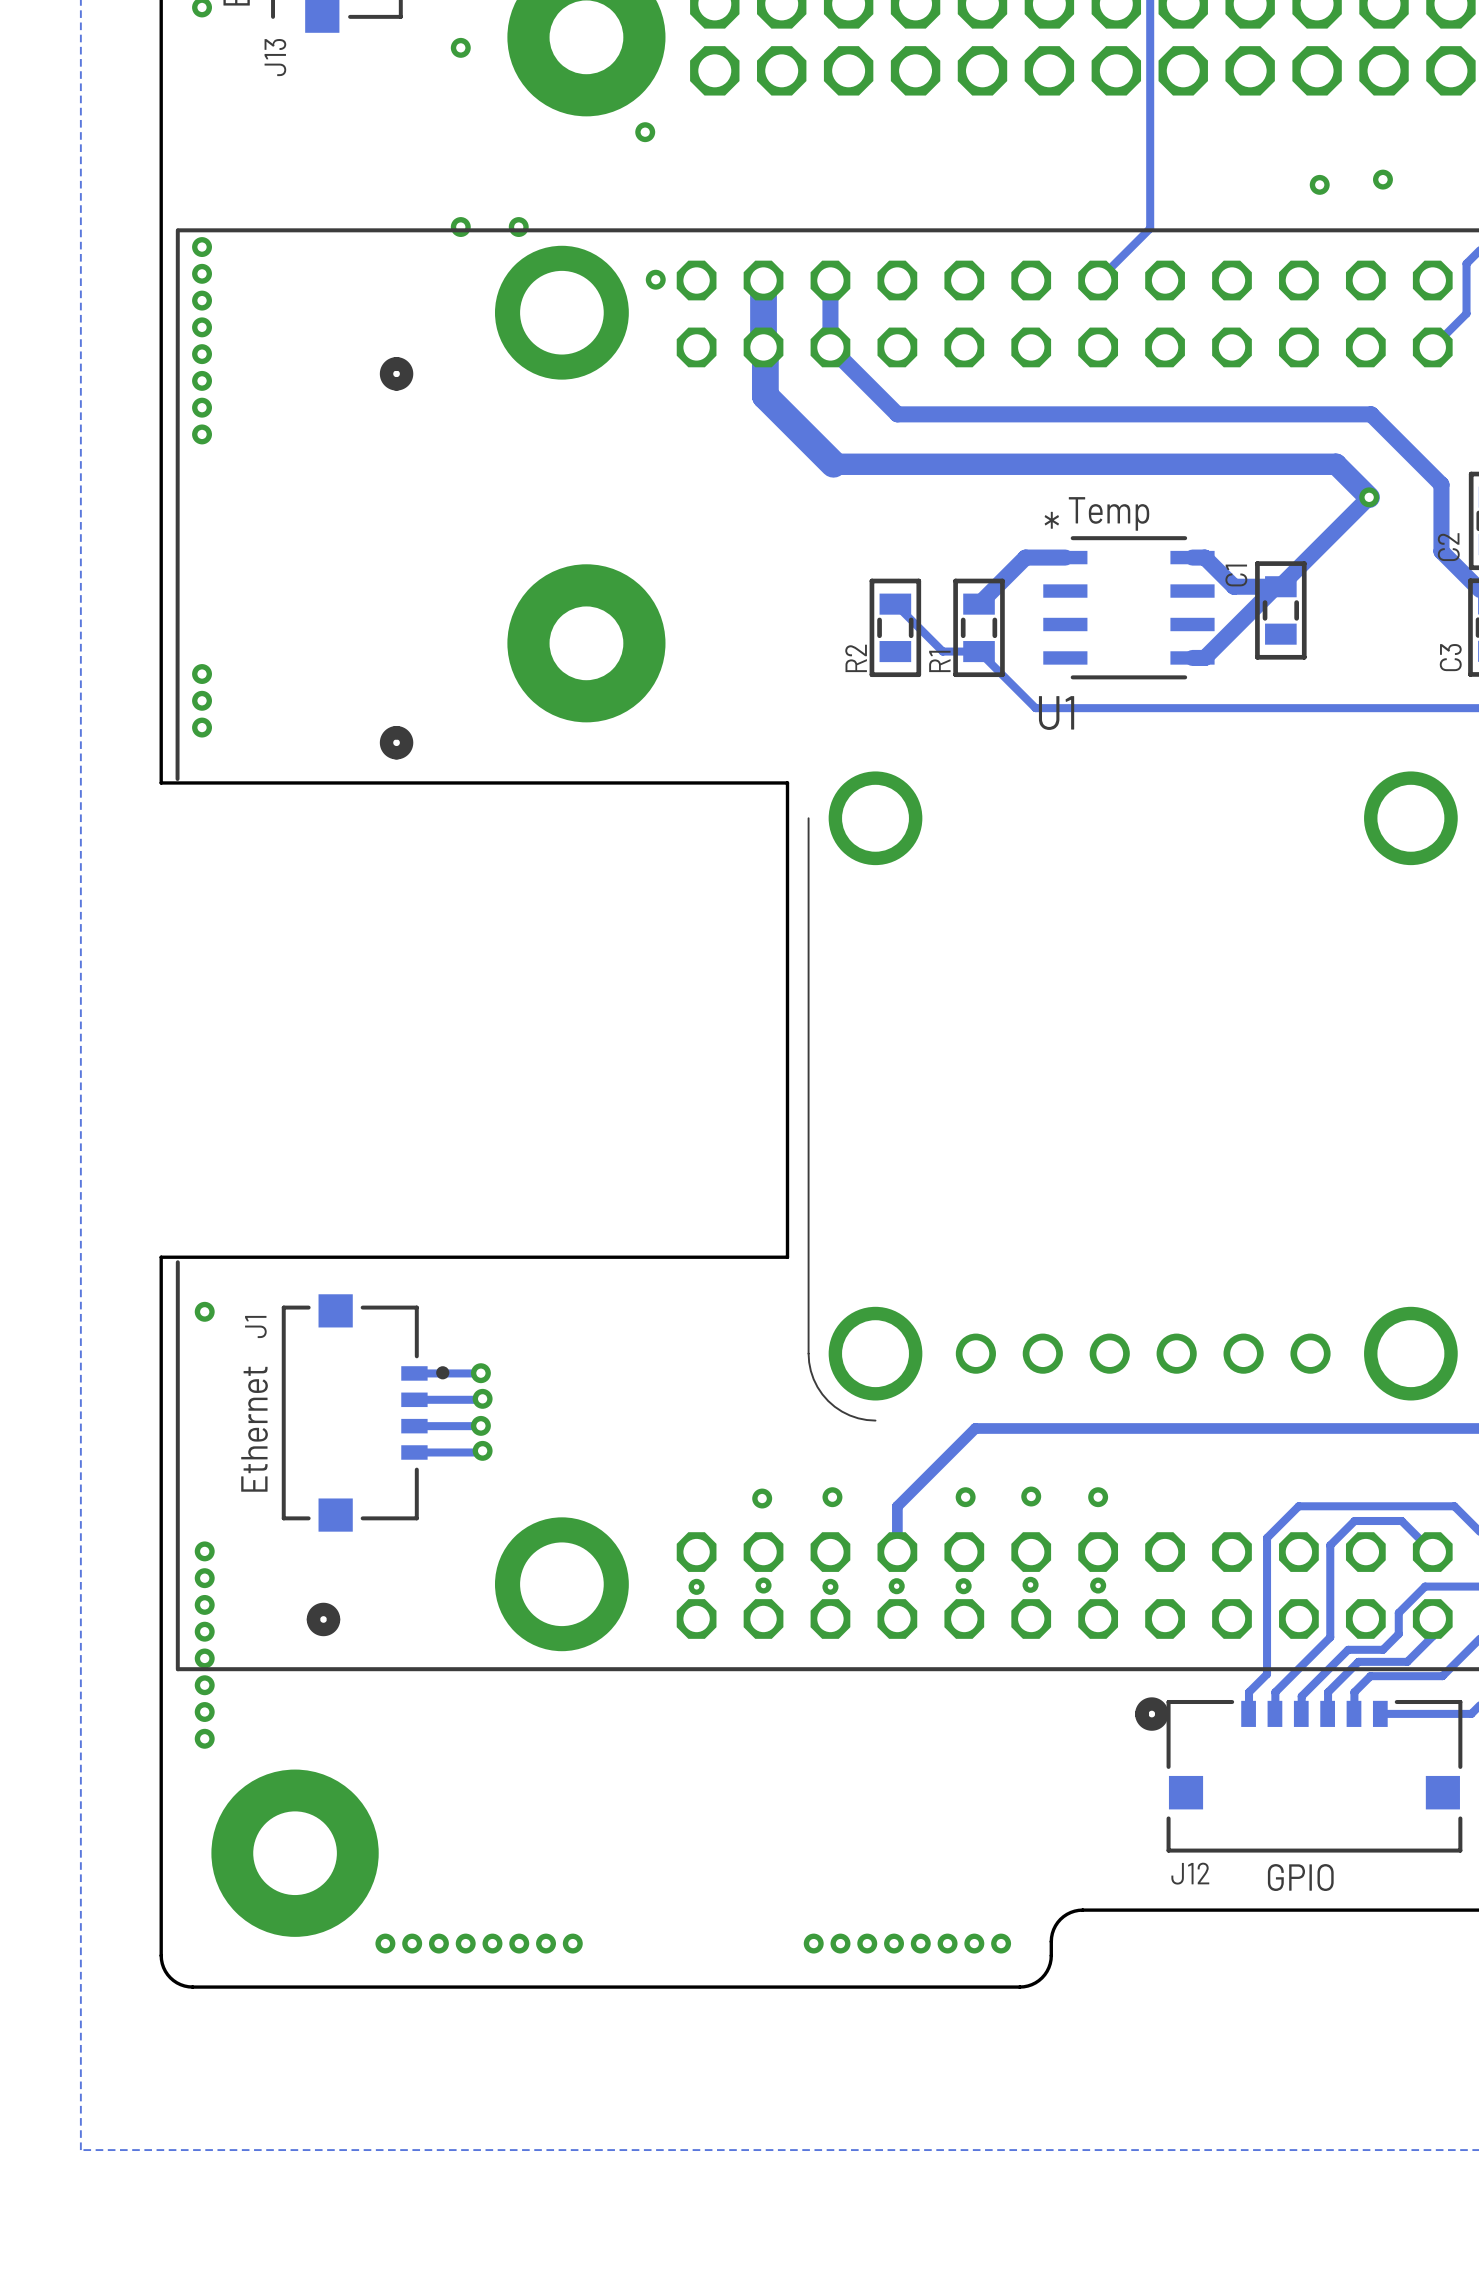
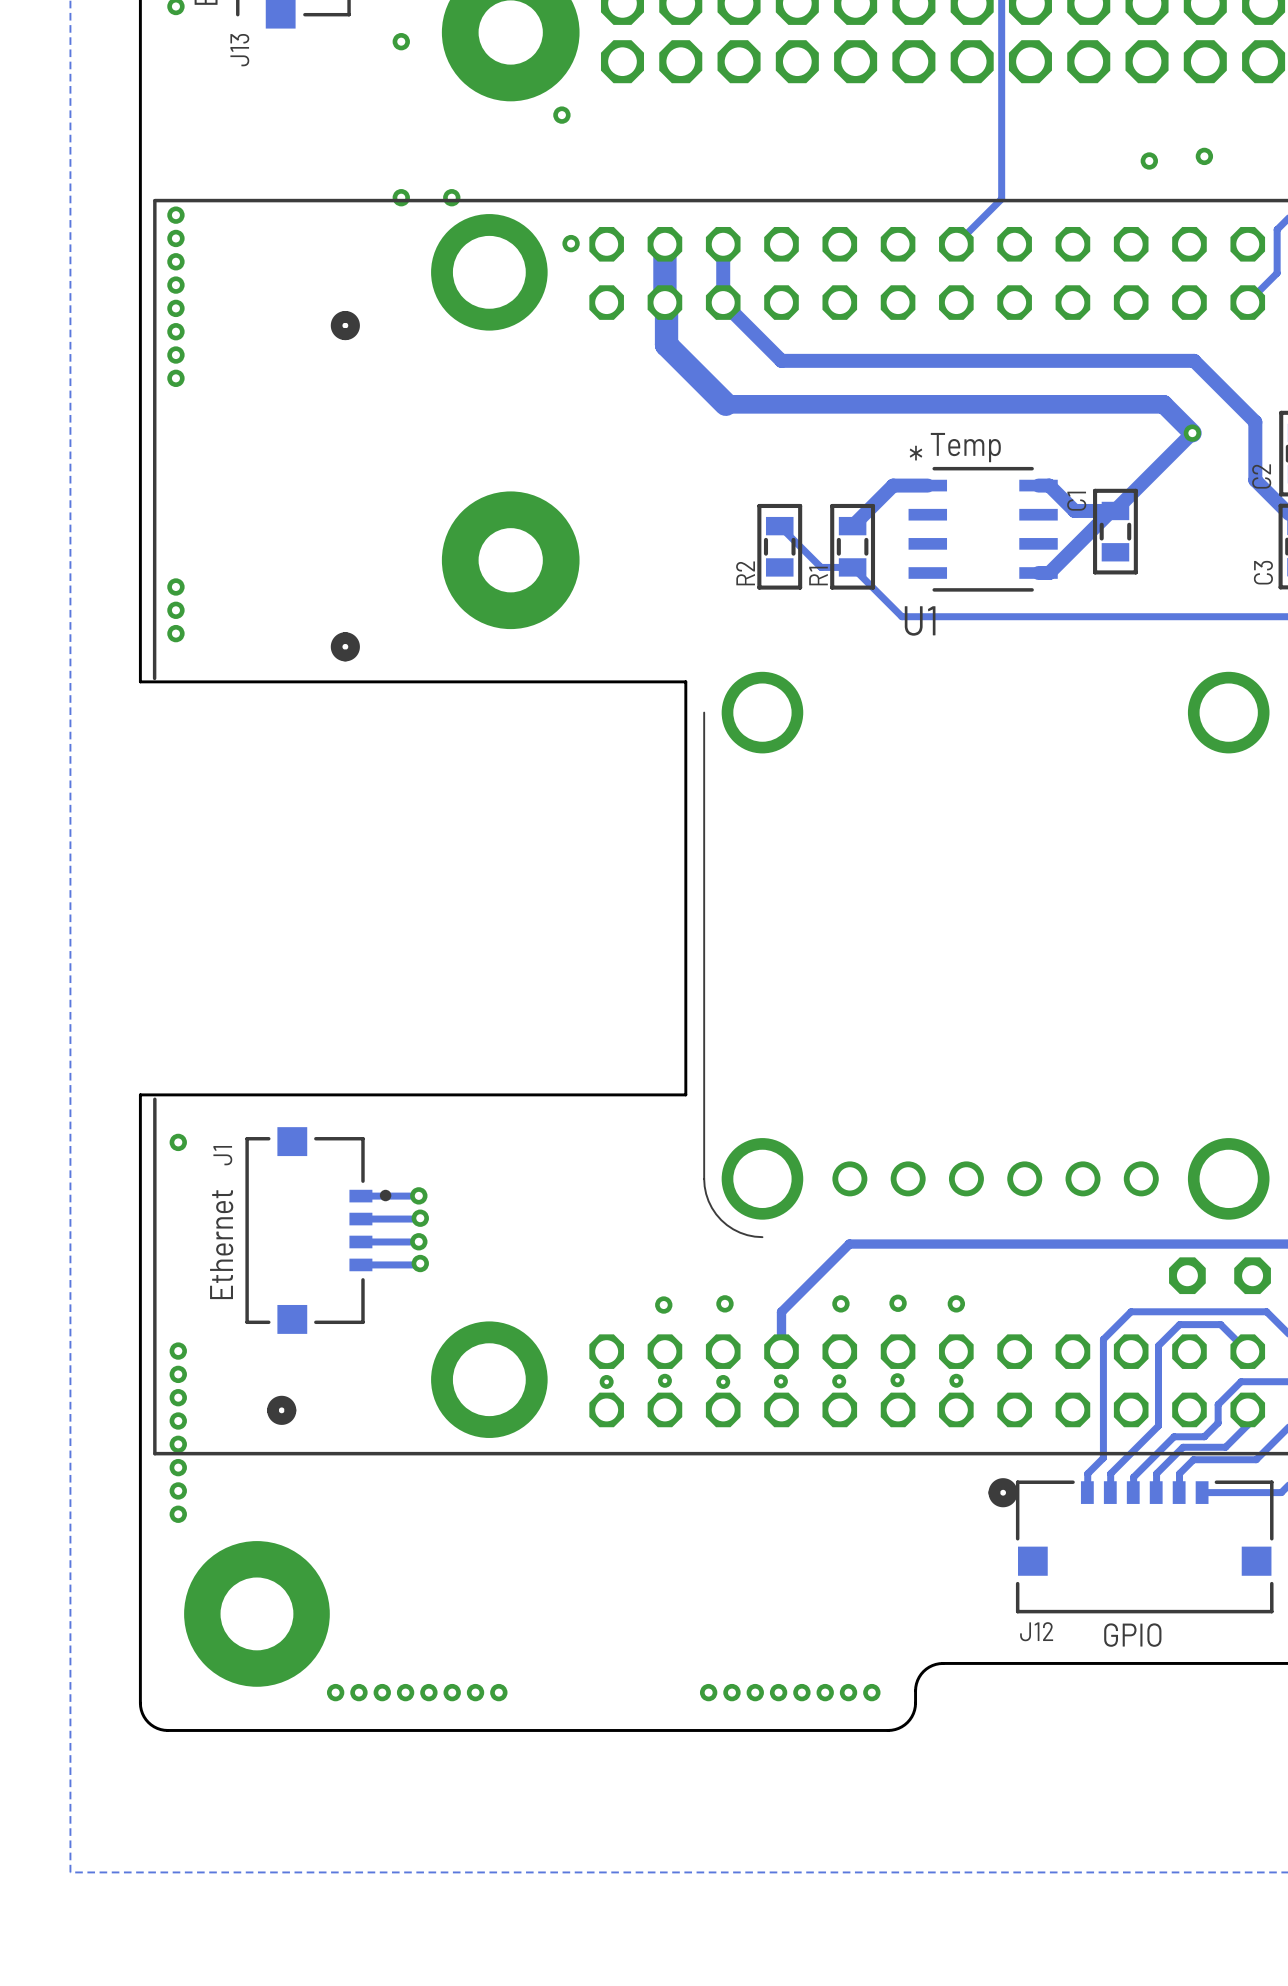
part: none -> (1187, 1275)
part: none -> (1252, 1275)

